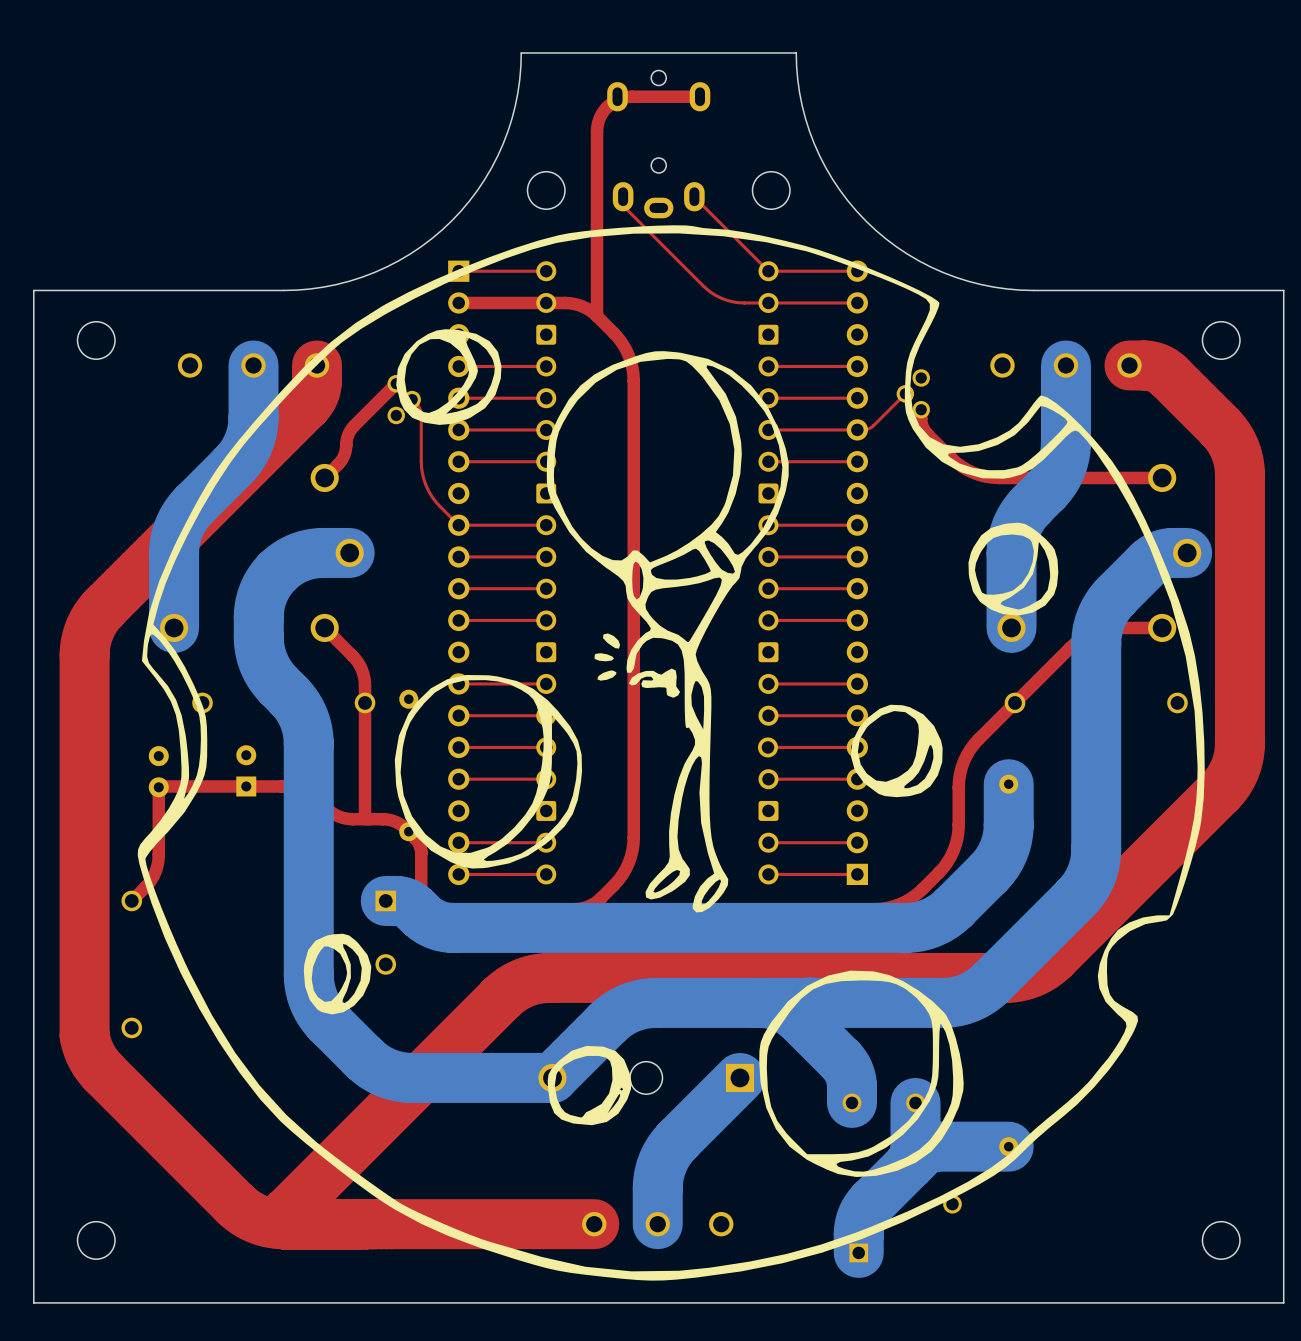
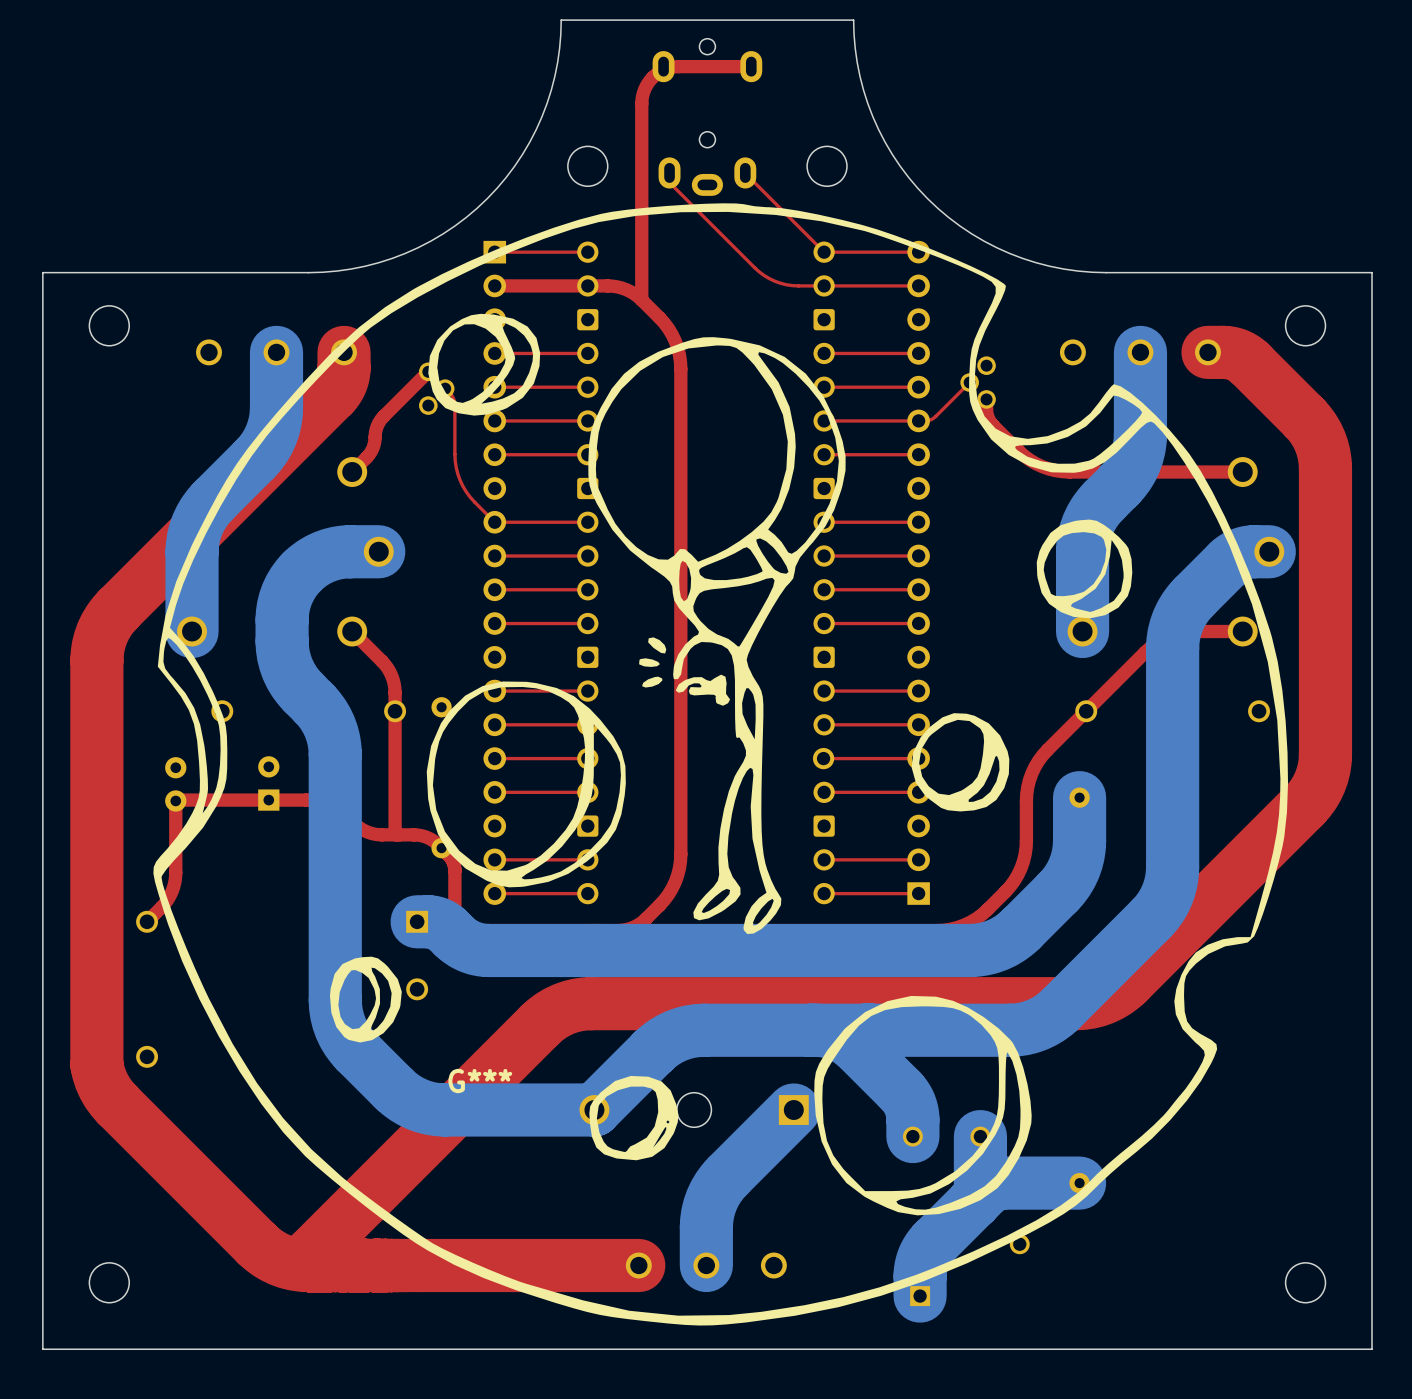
G***: none -> (720, 764)

